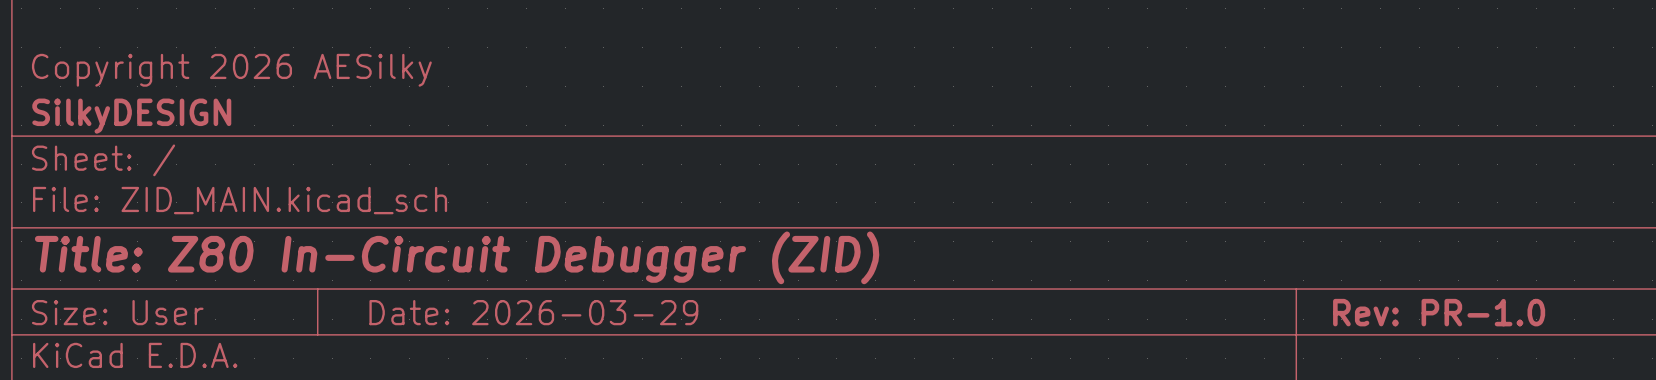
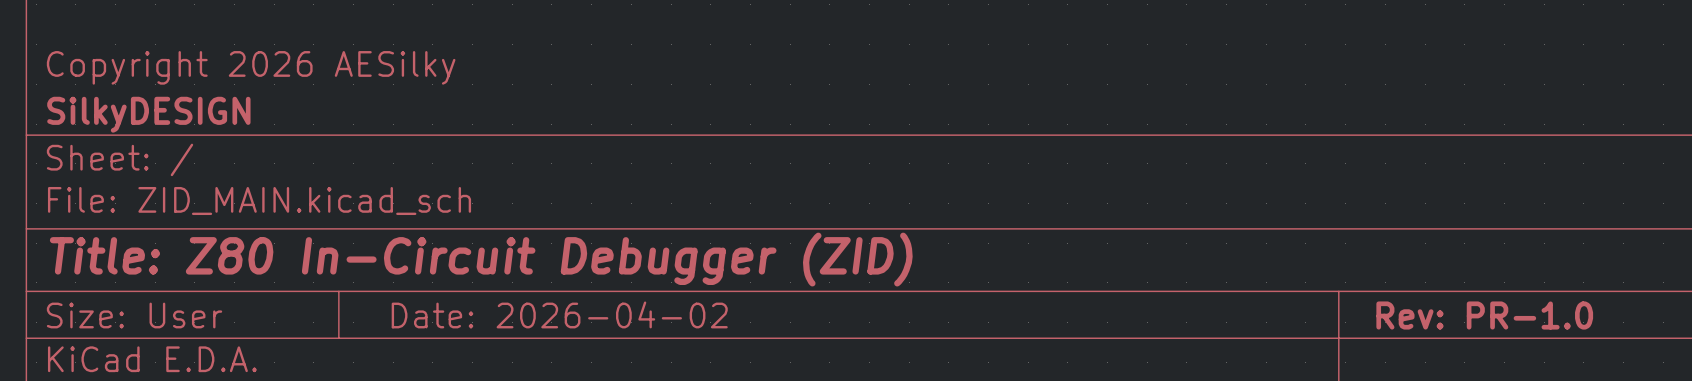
title block: Date: 2026-03-29 (533, 312) -> Date: 2026-04-02 (559, 314)

